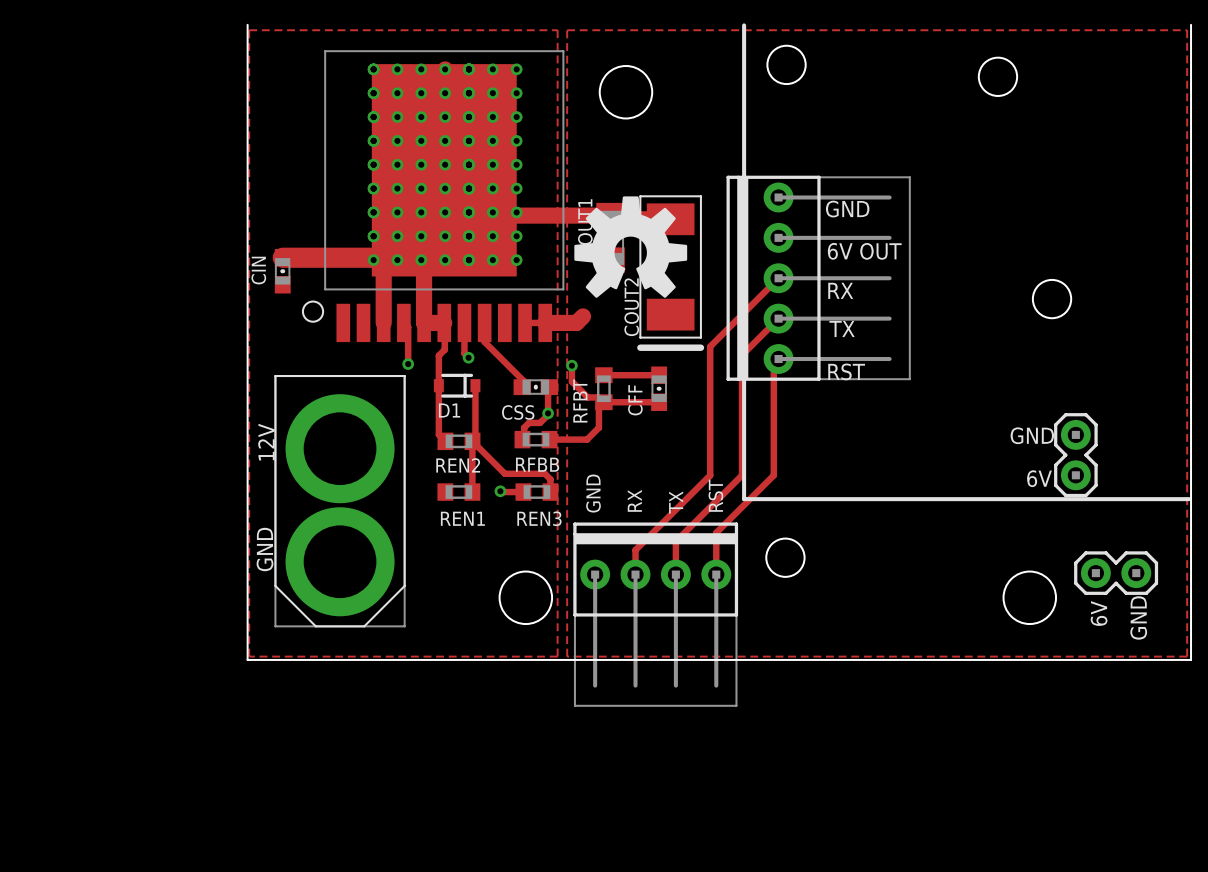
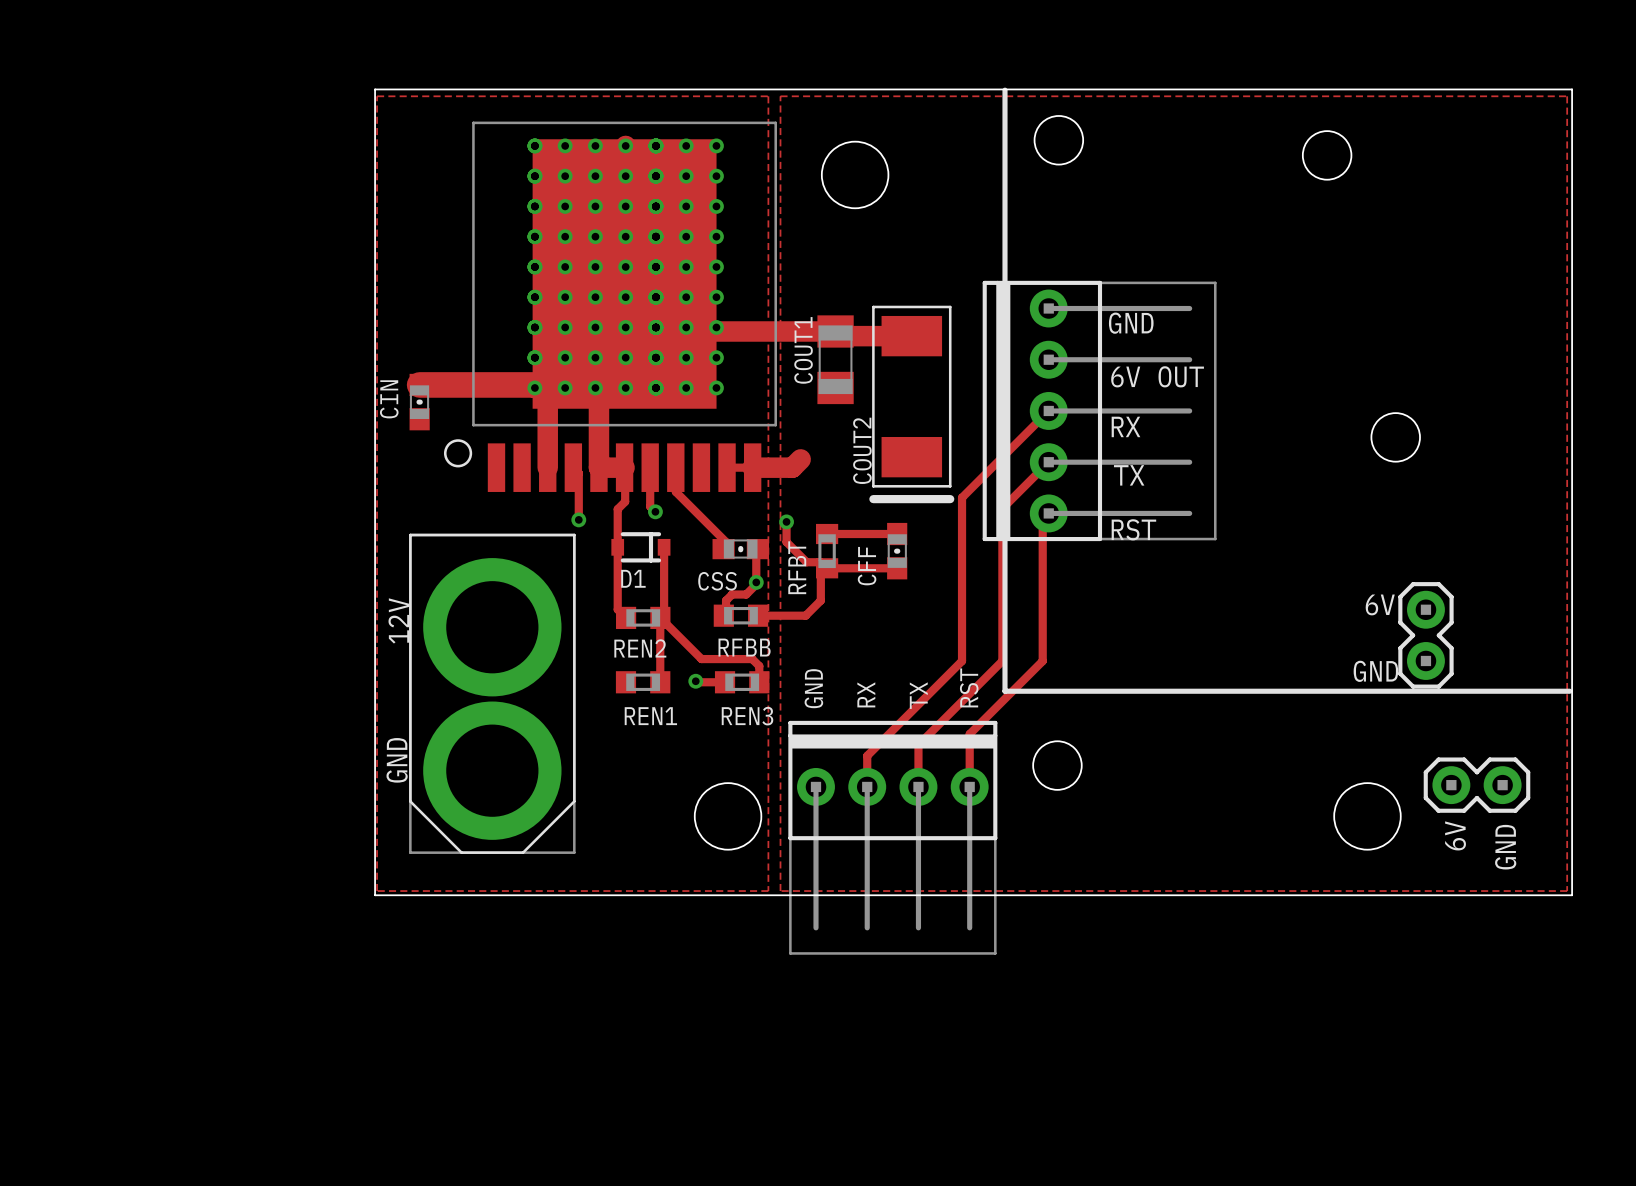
board edge: none -> (375, 89) (1572, 89)
drawing: [574, 196, 688, 298] -> none
text: GND (1032, 435) -> 6V (1380, 604)
text: 6V (1039, 478) -> GND (1375, 671)

